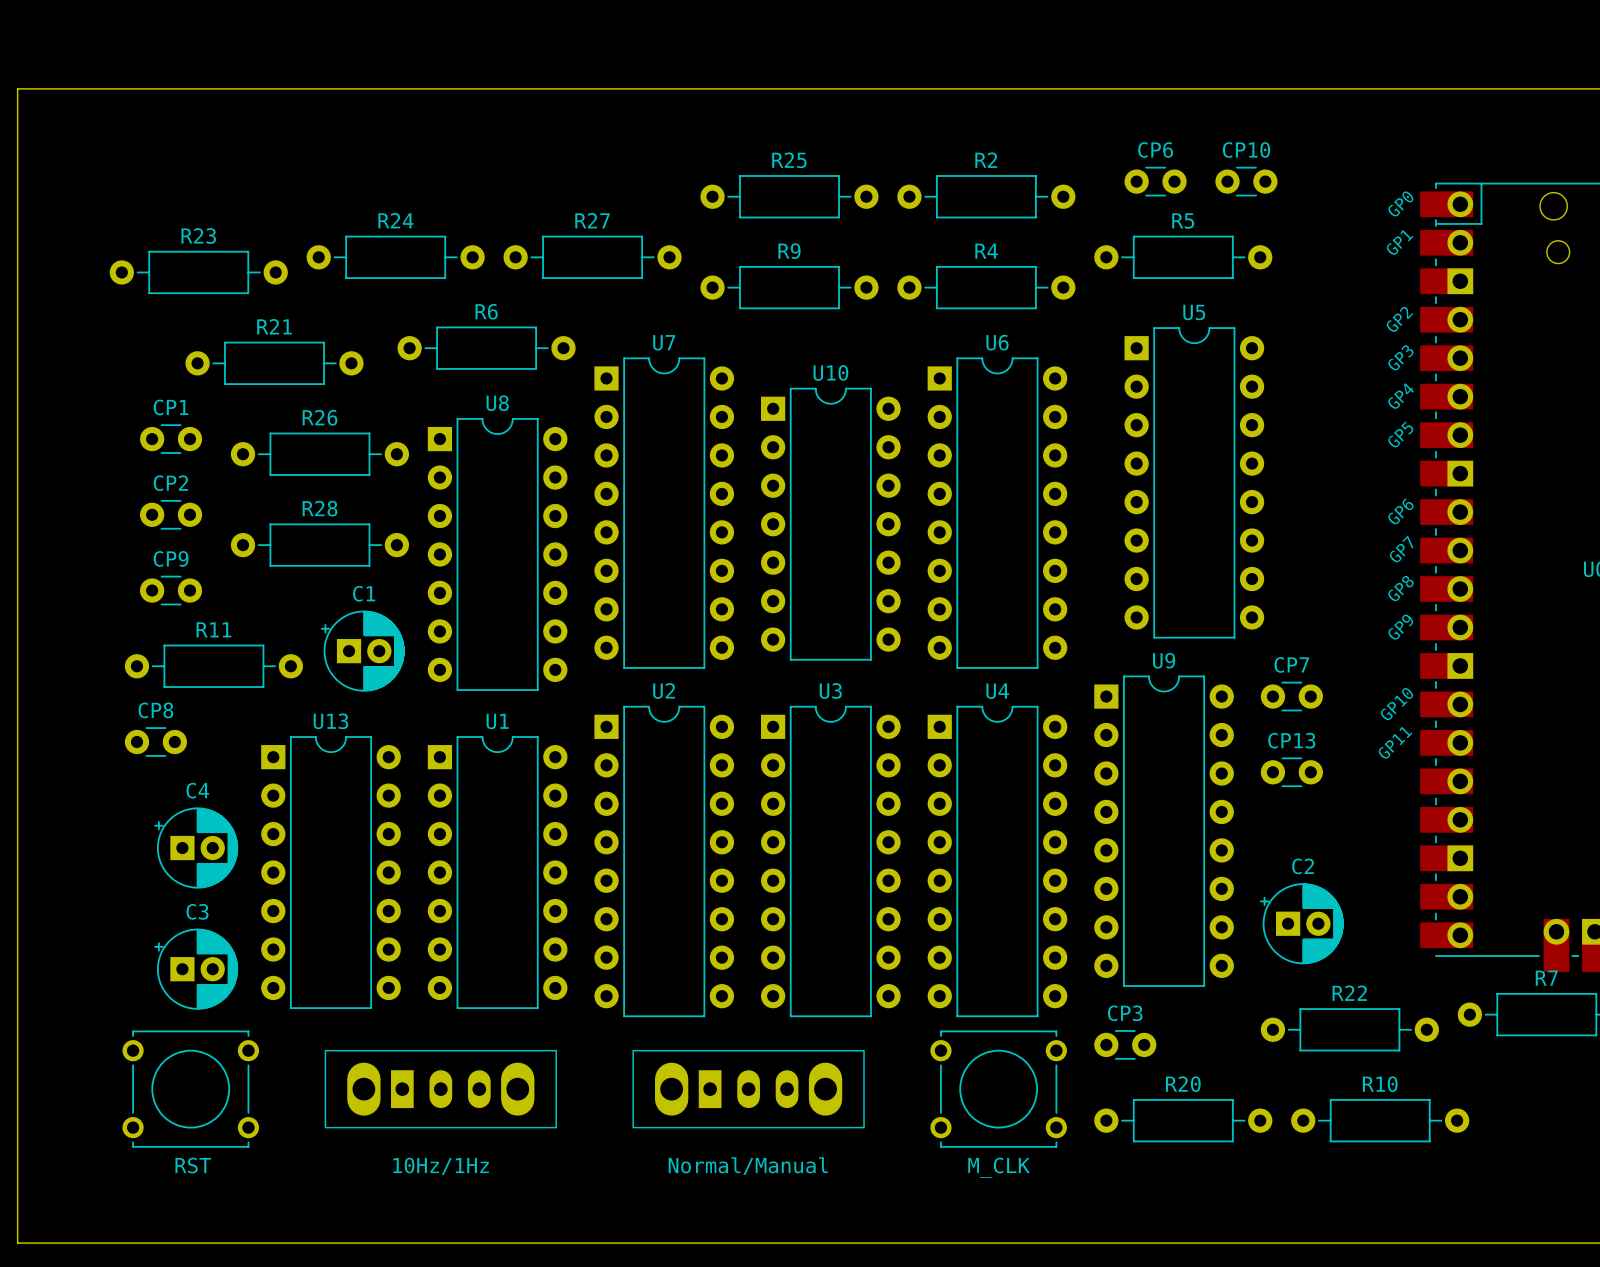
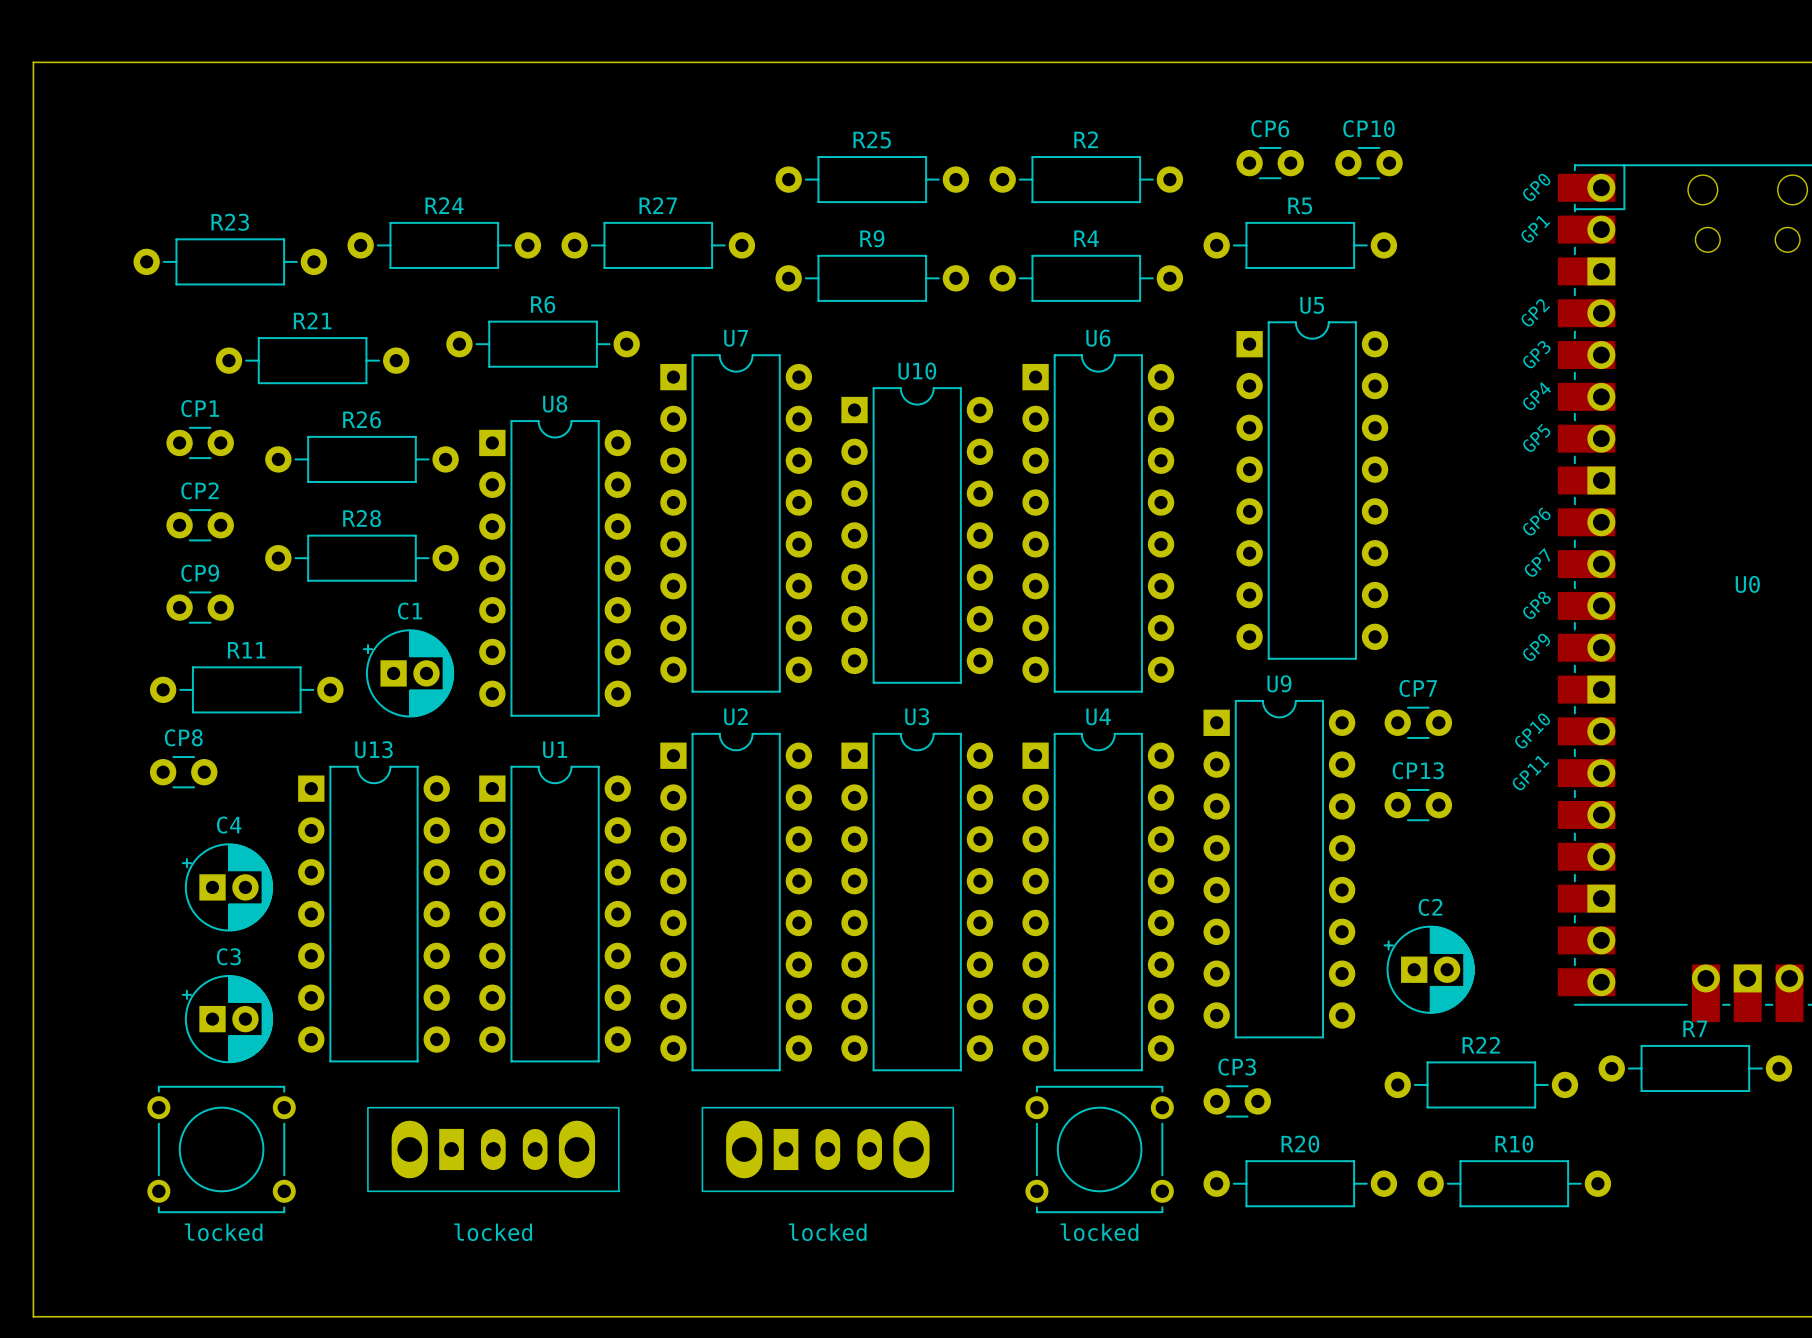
RST name: RST (193, 1165) -> locked (223, 1232)
10Hz/1Hz name: 10Hz/1Hz (441, 1166) -> locked (493, 1232)
Normal/Manual name: Normal/Manual (748, 1166) -> locked (827, 1232)
M_CLK name: M_CLK (999, 1167) -> locked (1099, 1232)

